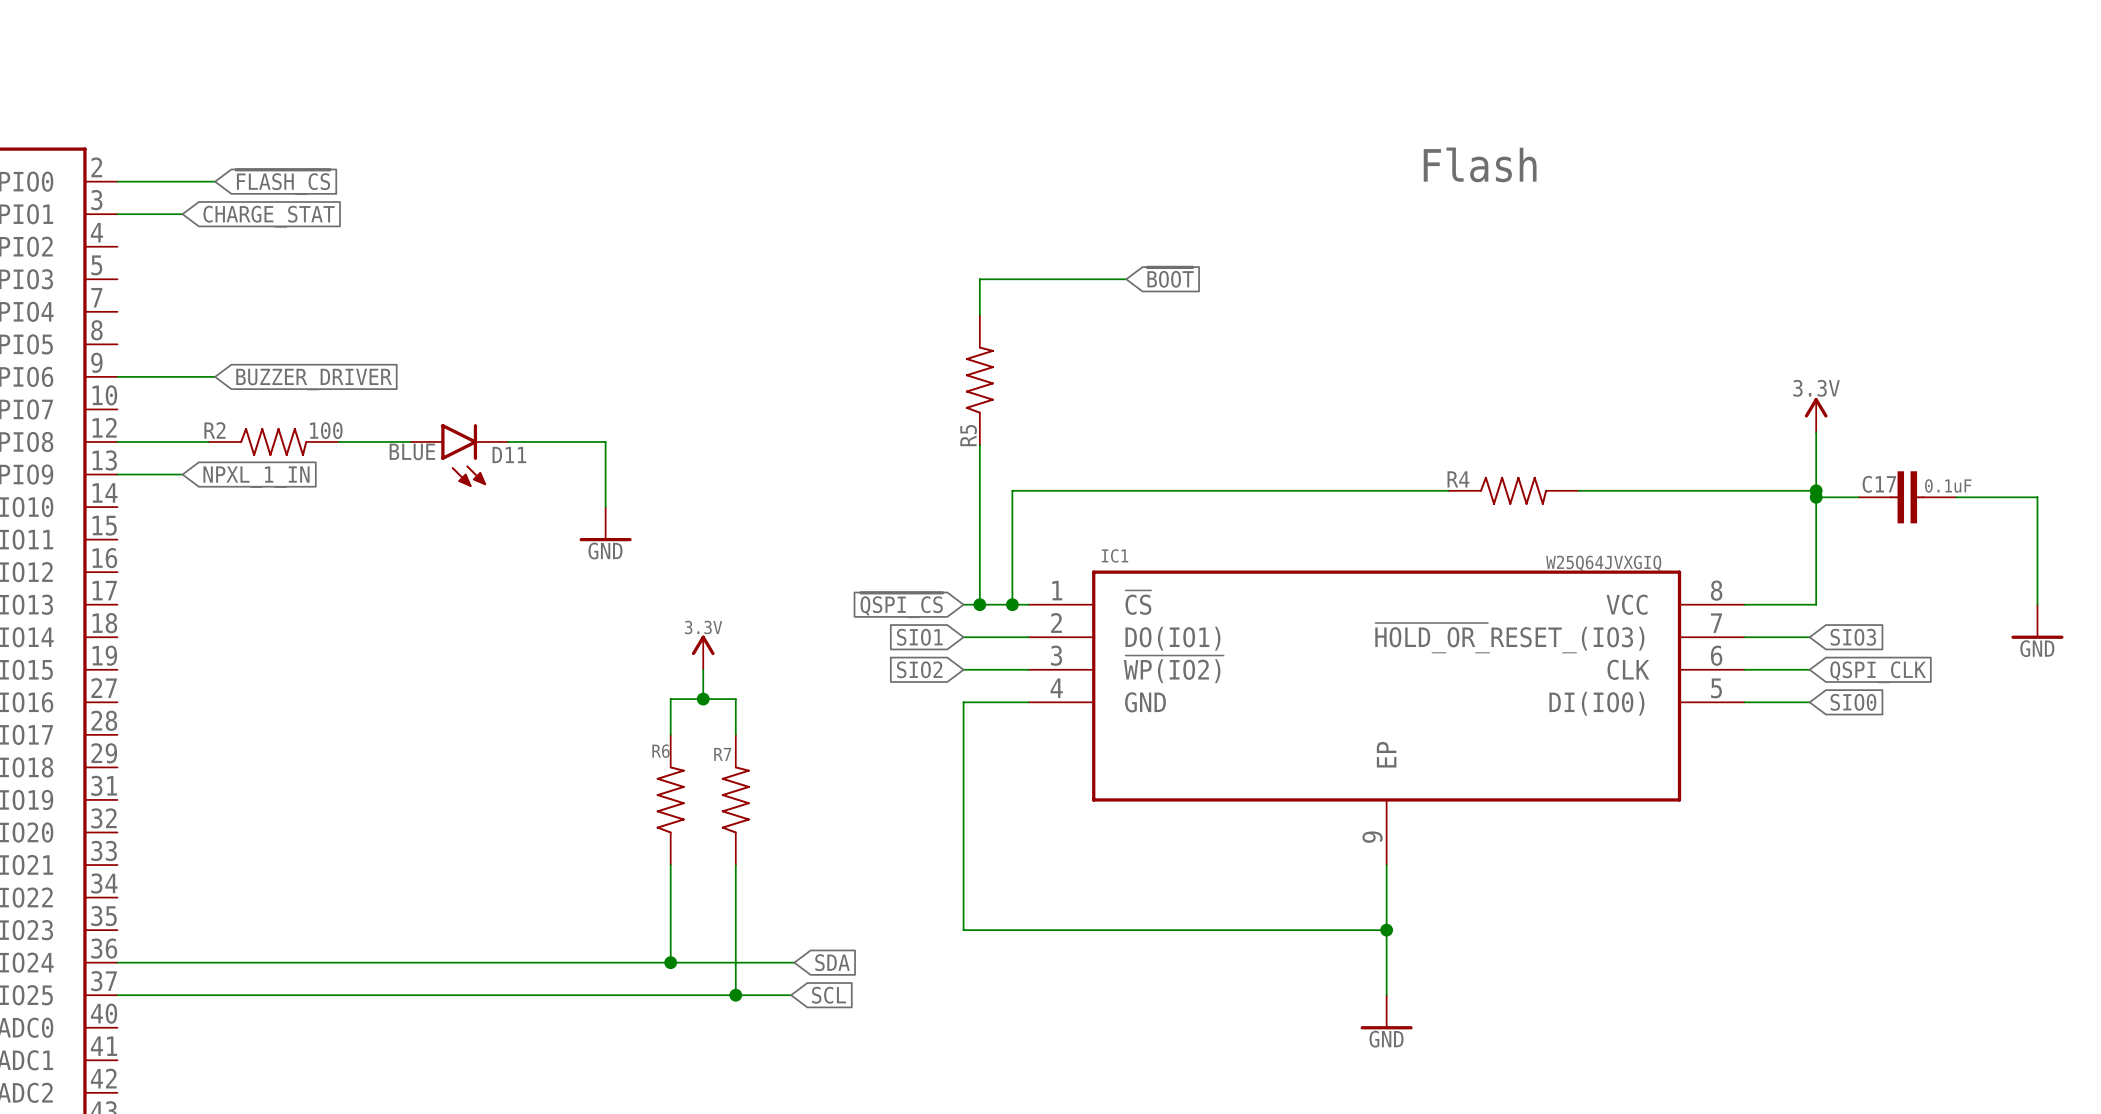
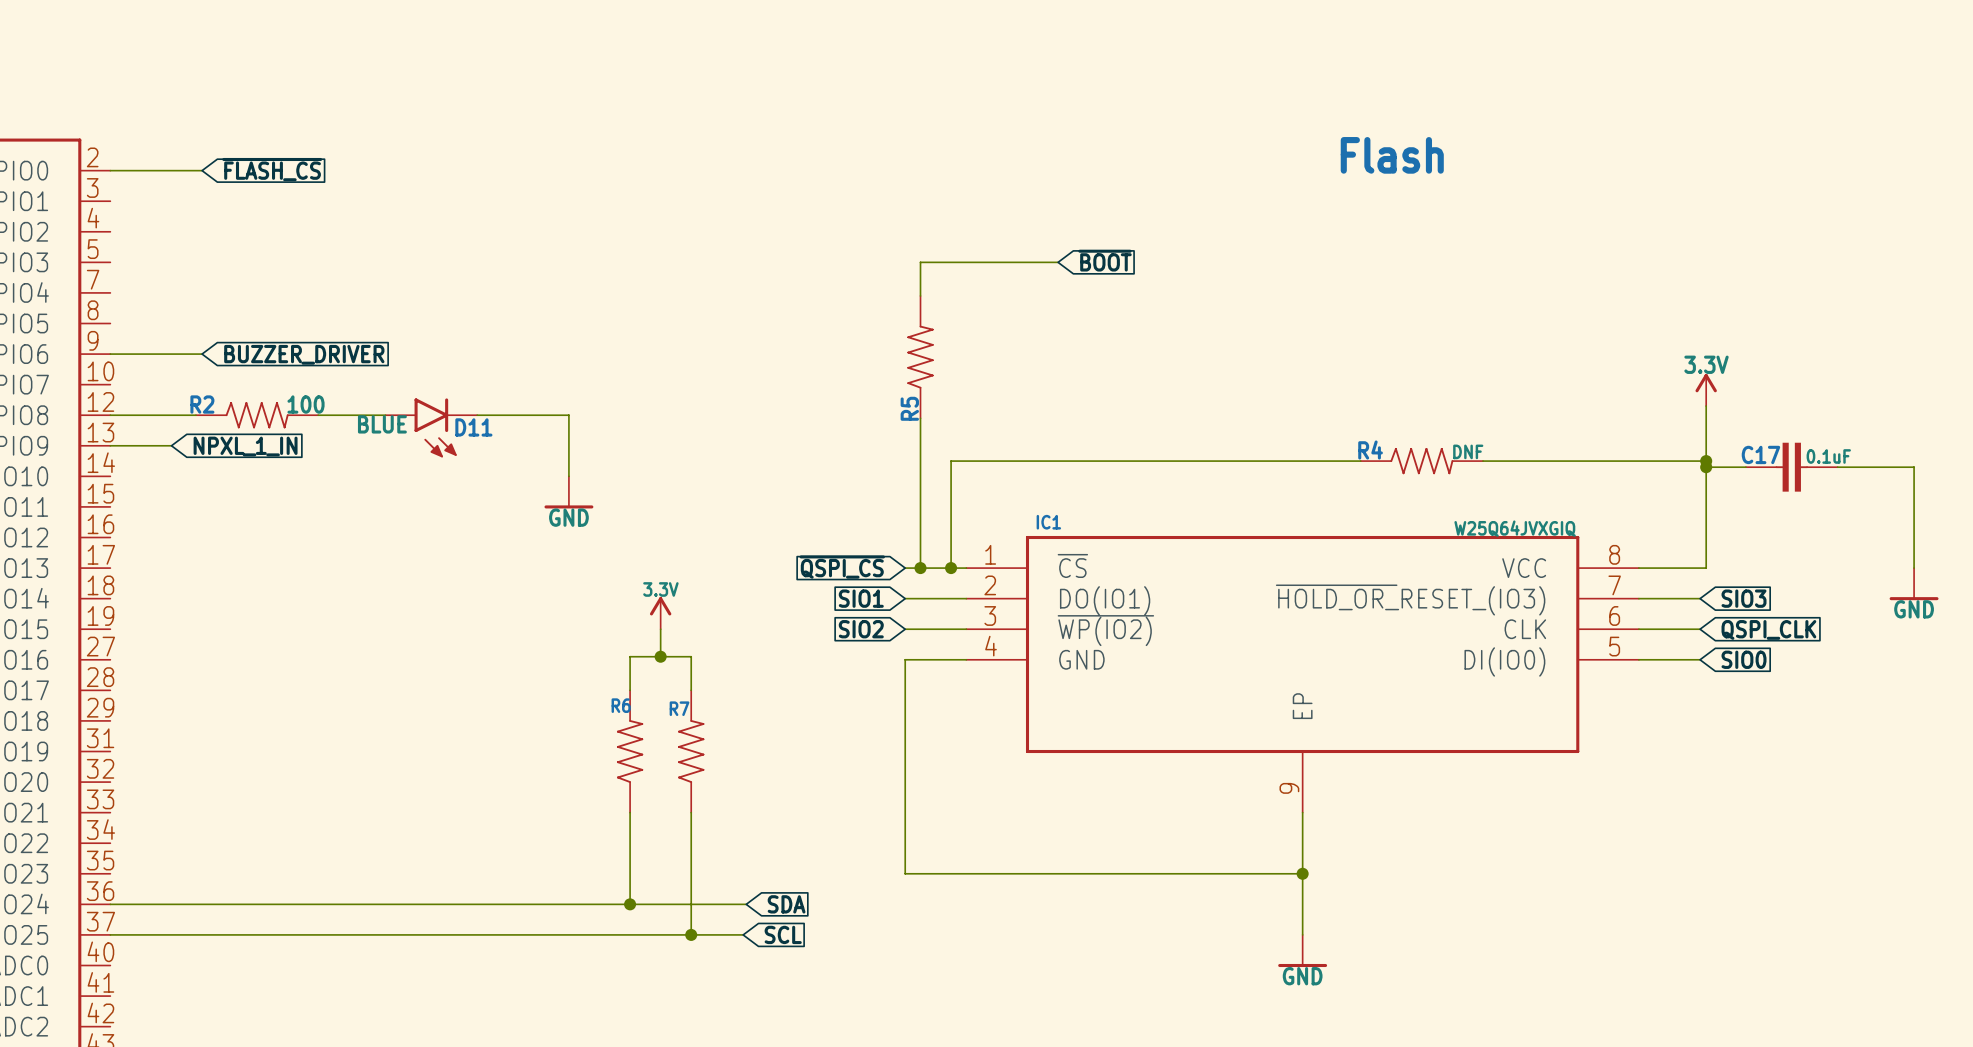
wire: (117, 214) (182, 214) -> none
global label: CHARGE_STAT (269, 216) -> none
R4 value: none -> DNF (1468, 451)

